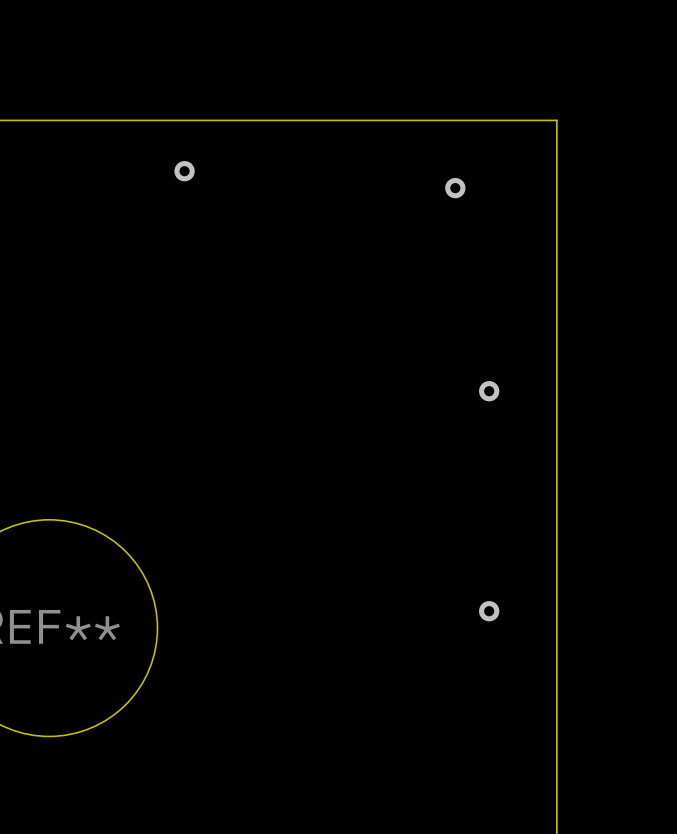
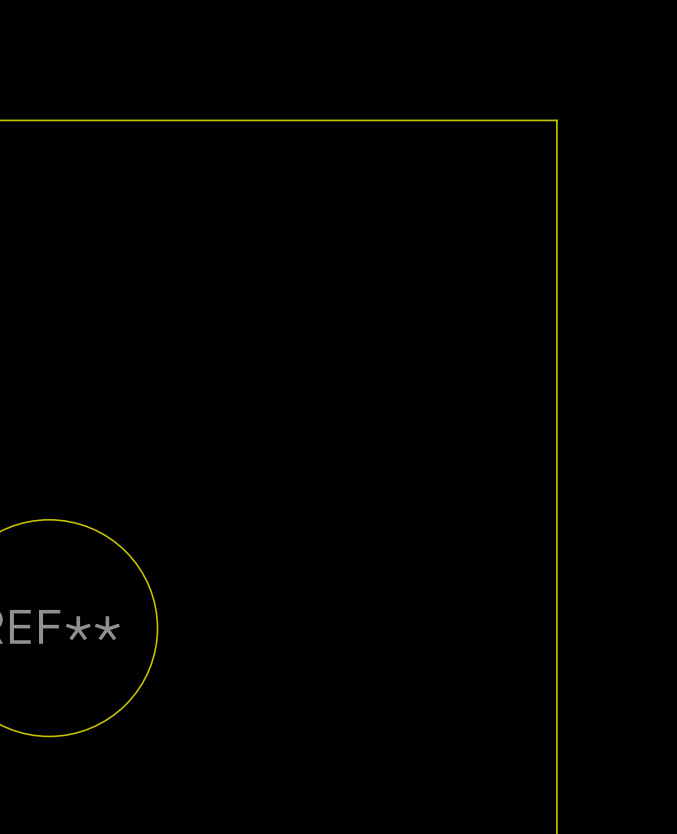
via: (184, 171) -> none
via: (455, 188) -> none
via: (489, 391) -> none
via: (489, 611) -> none

